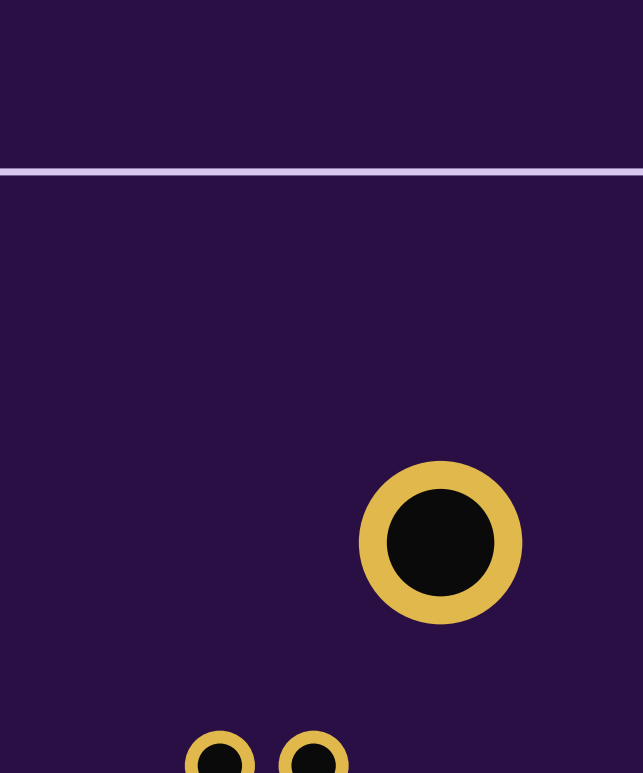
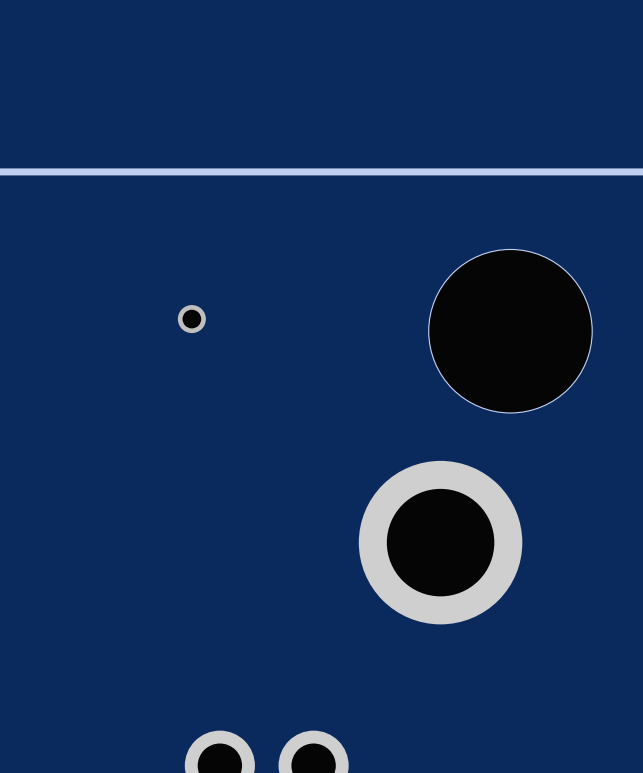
via: none -> (191, 319)
part: none -> (510, 331)

